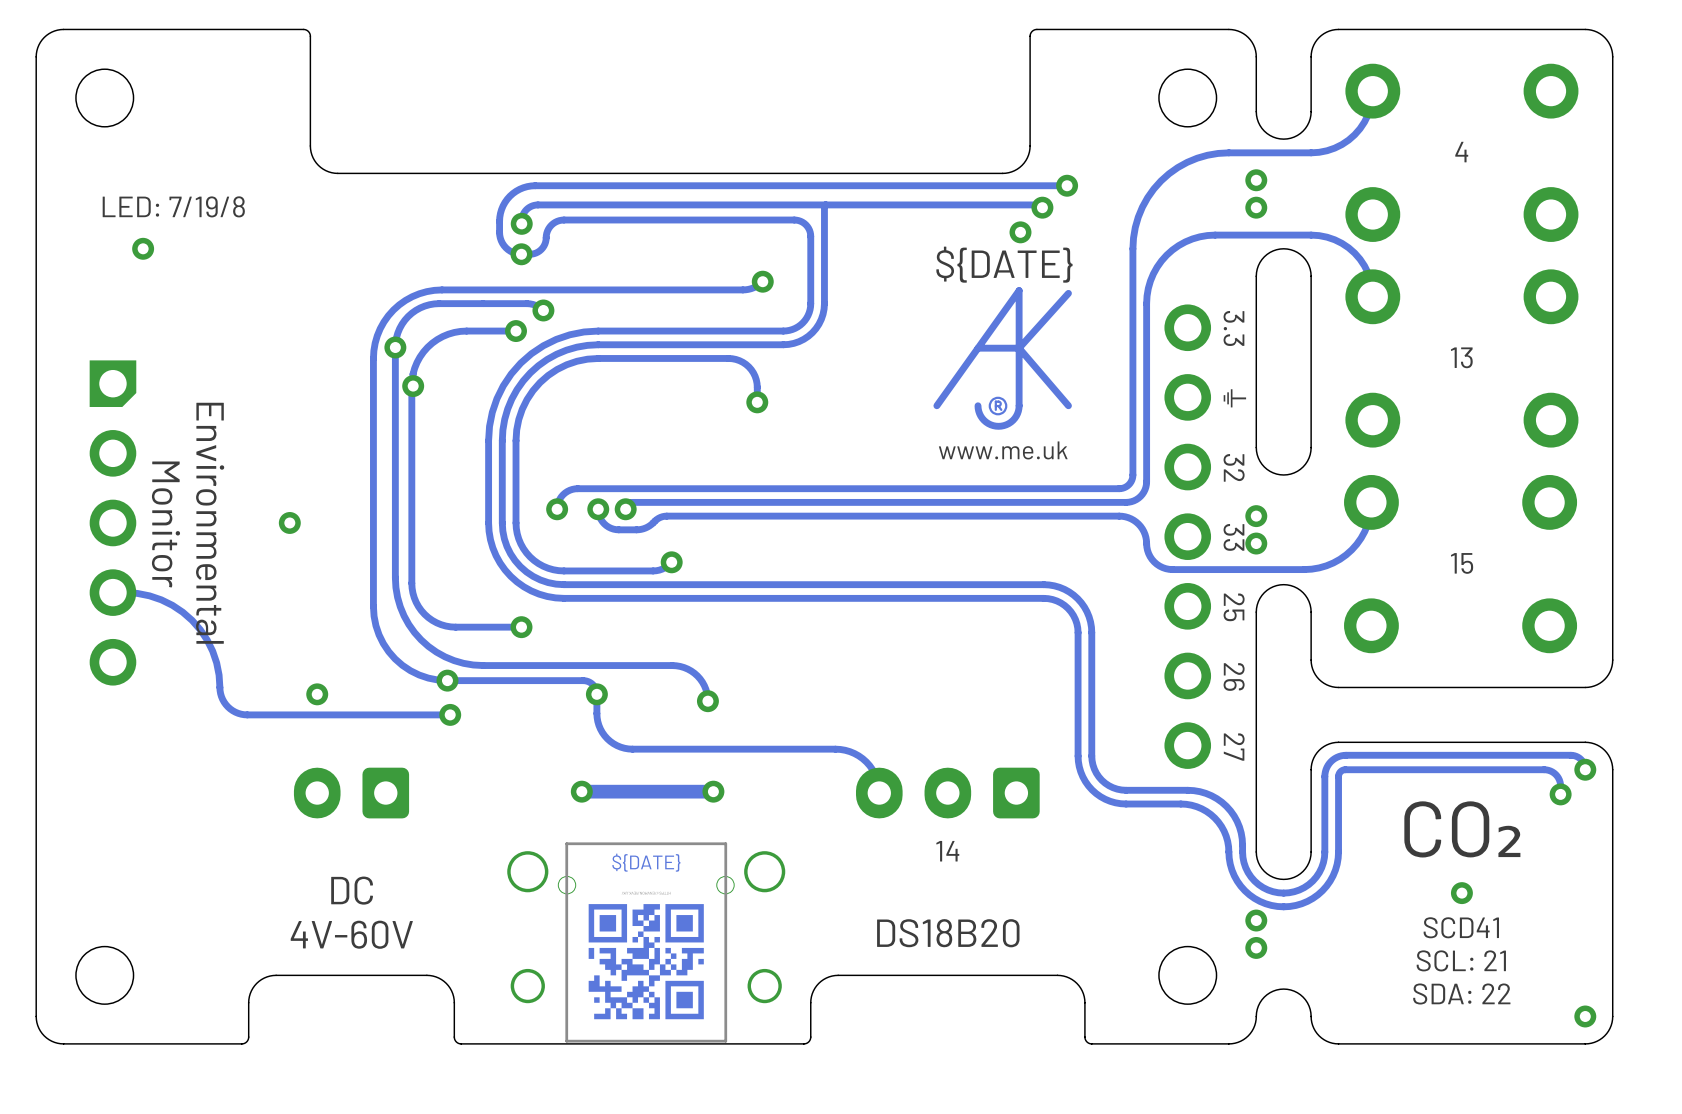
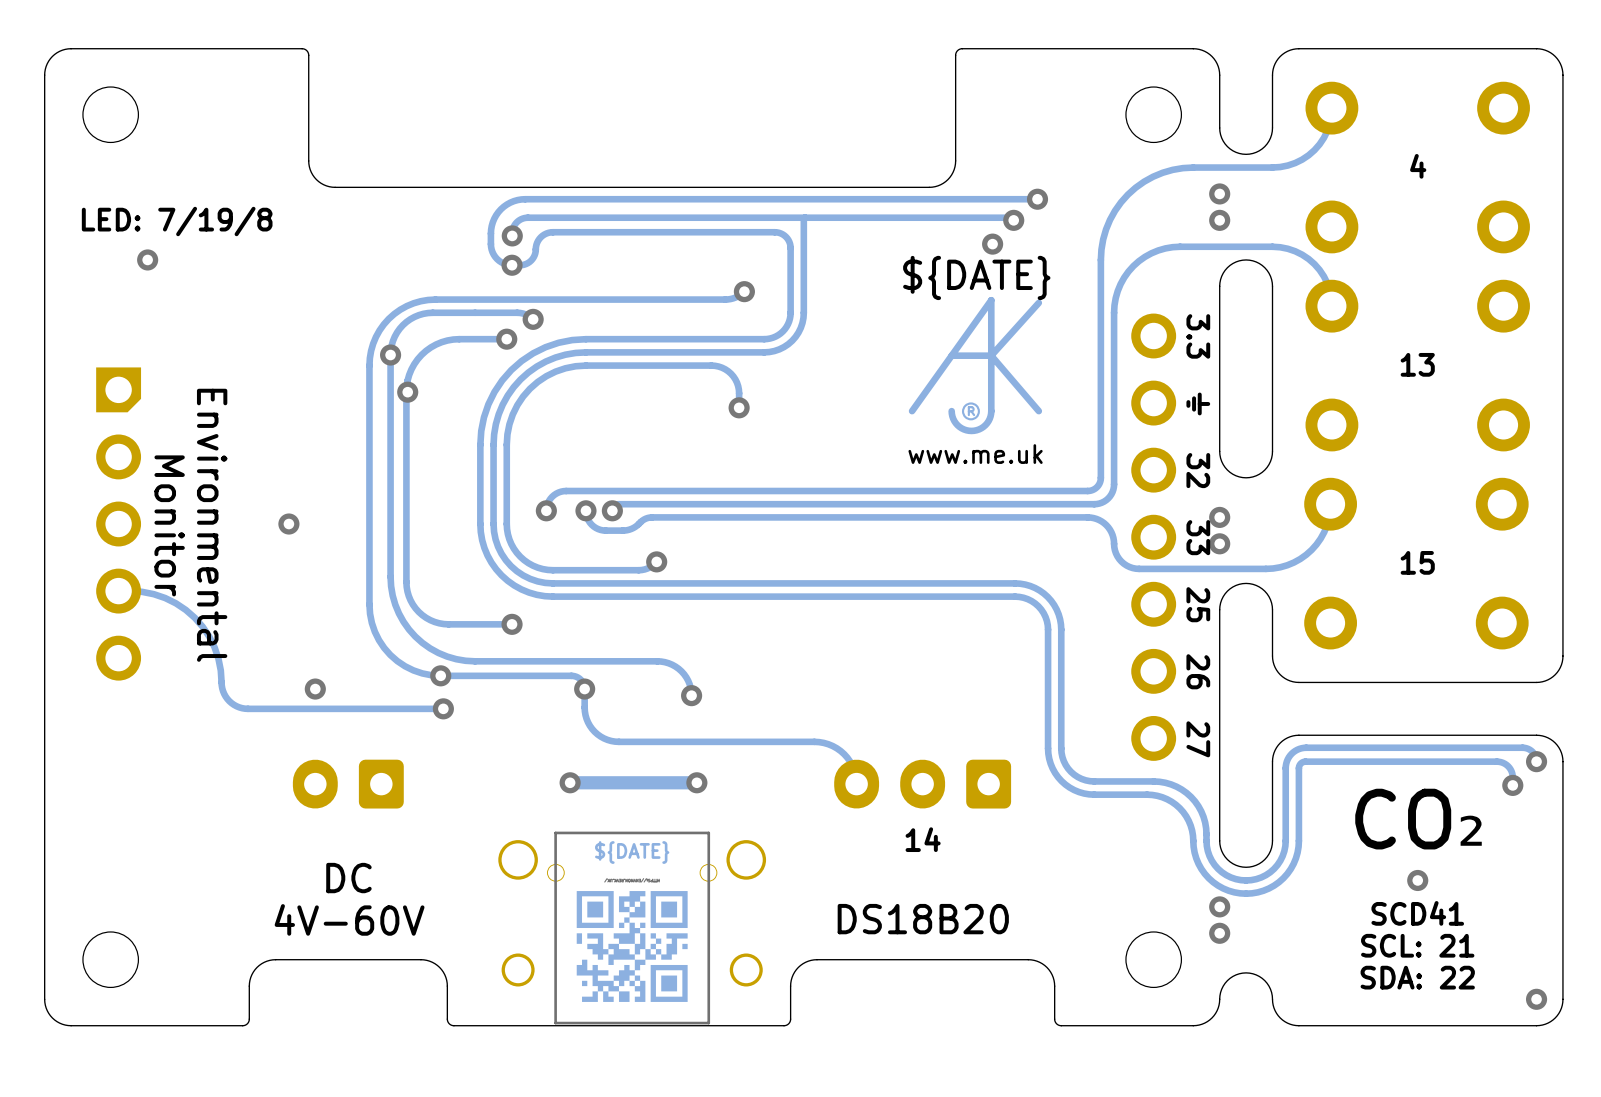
board edge: (1036, 29) (1032, 31) (1030, 35) (1030, 145) (1025, 160) (1019, 167) (1008, 172) (954, 173) -> (1008, 48) (961, 48) (956, 51) (954, 166) (945, 181) (929, 187)

